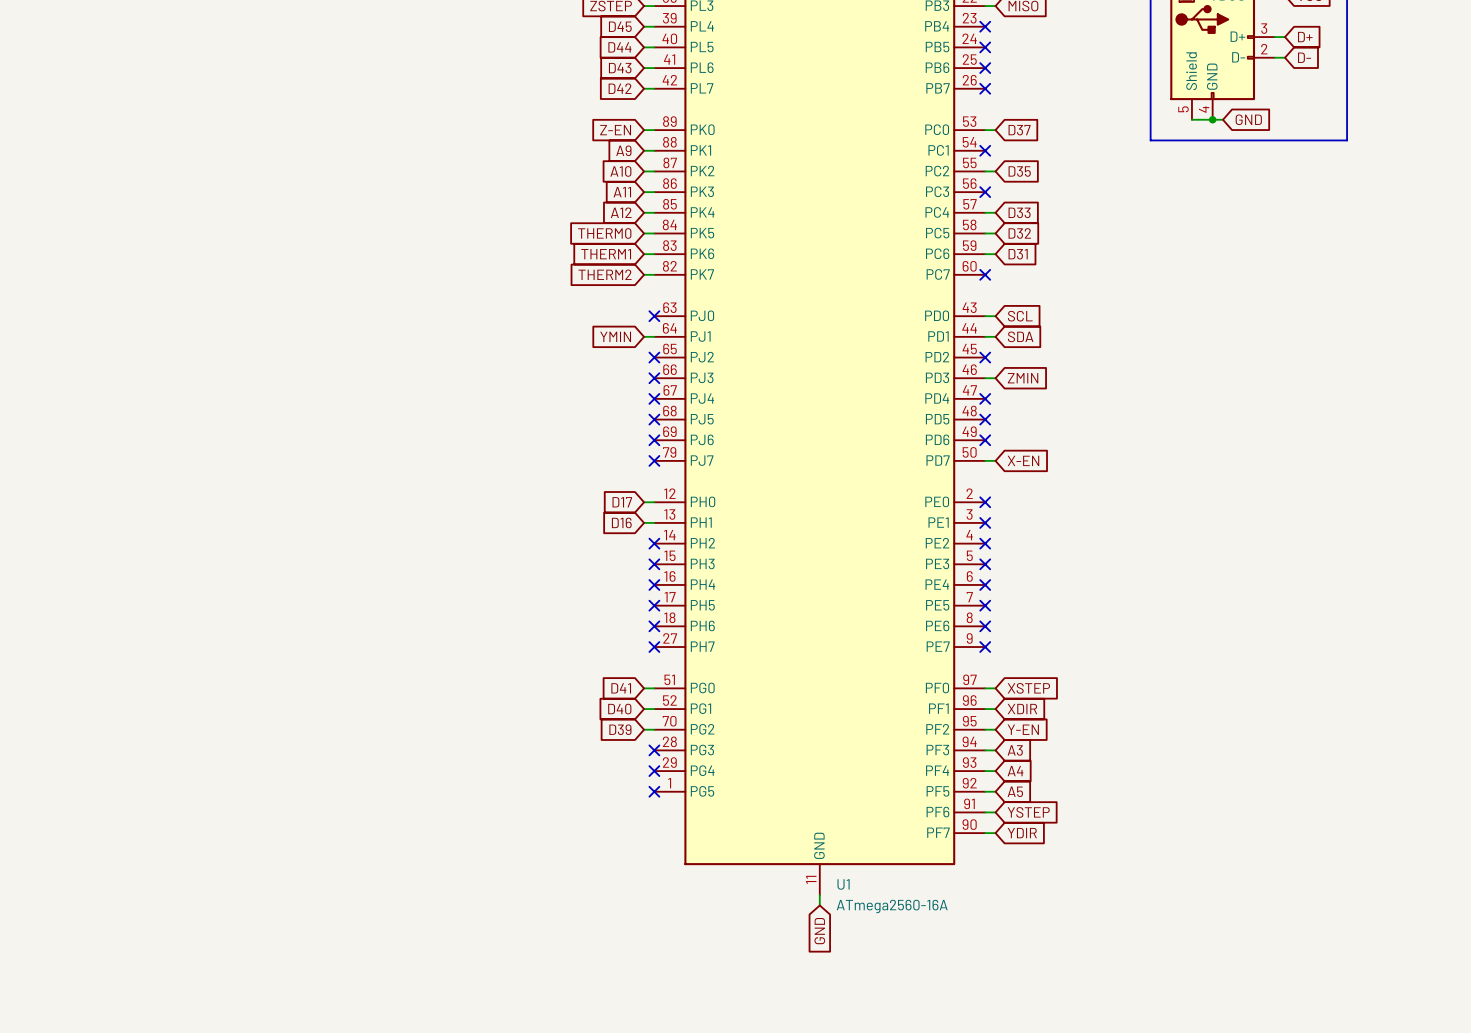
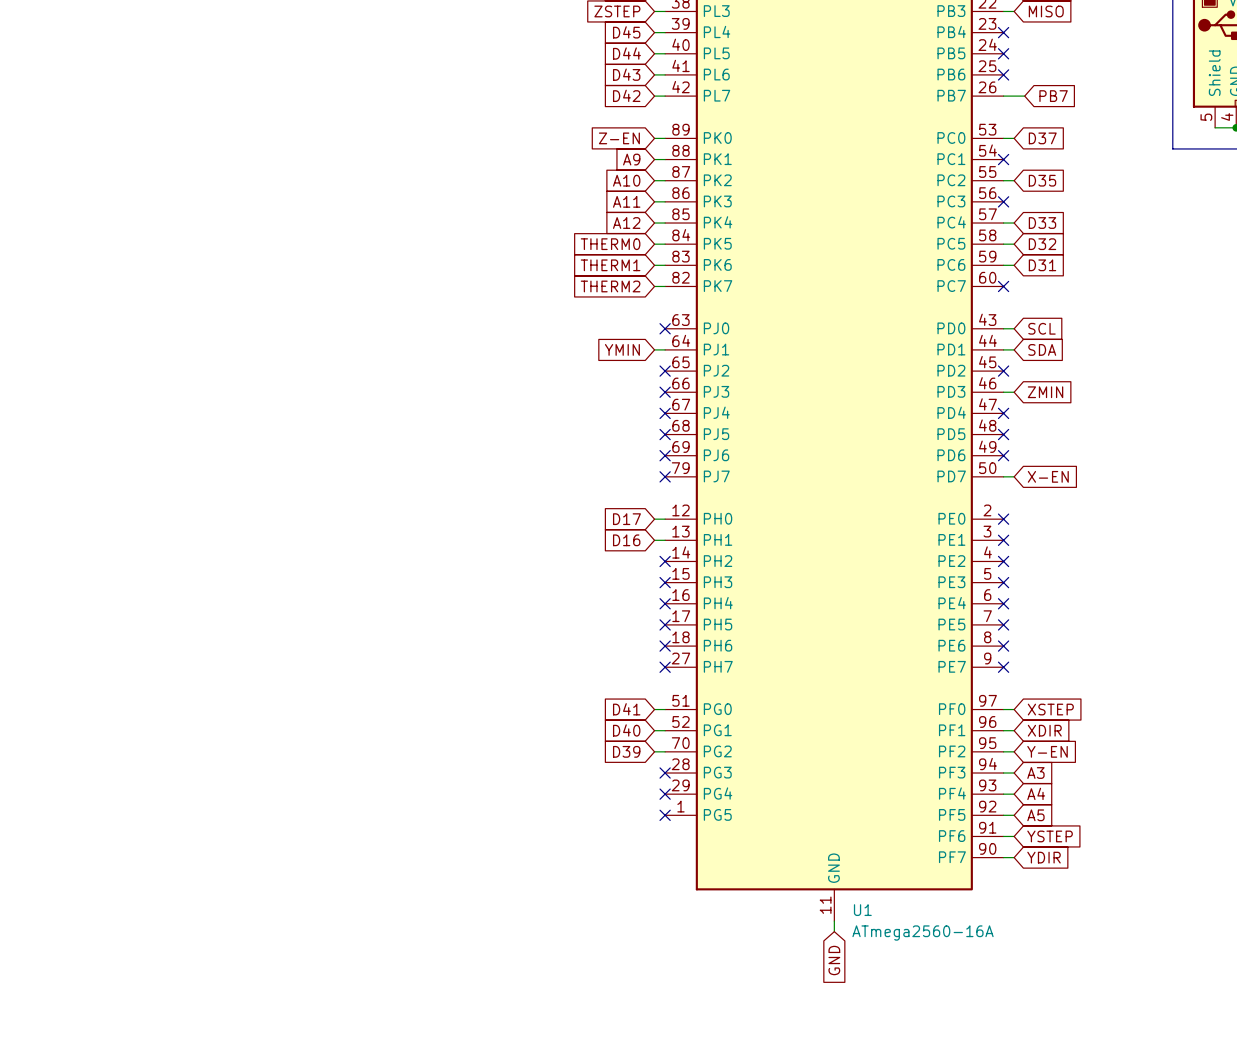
wire: none -> (1003, 96) (1024, 96)
no-connect mark: (985, 88) -> none
global label: none -> PB7 (1053, 96)

